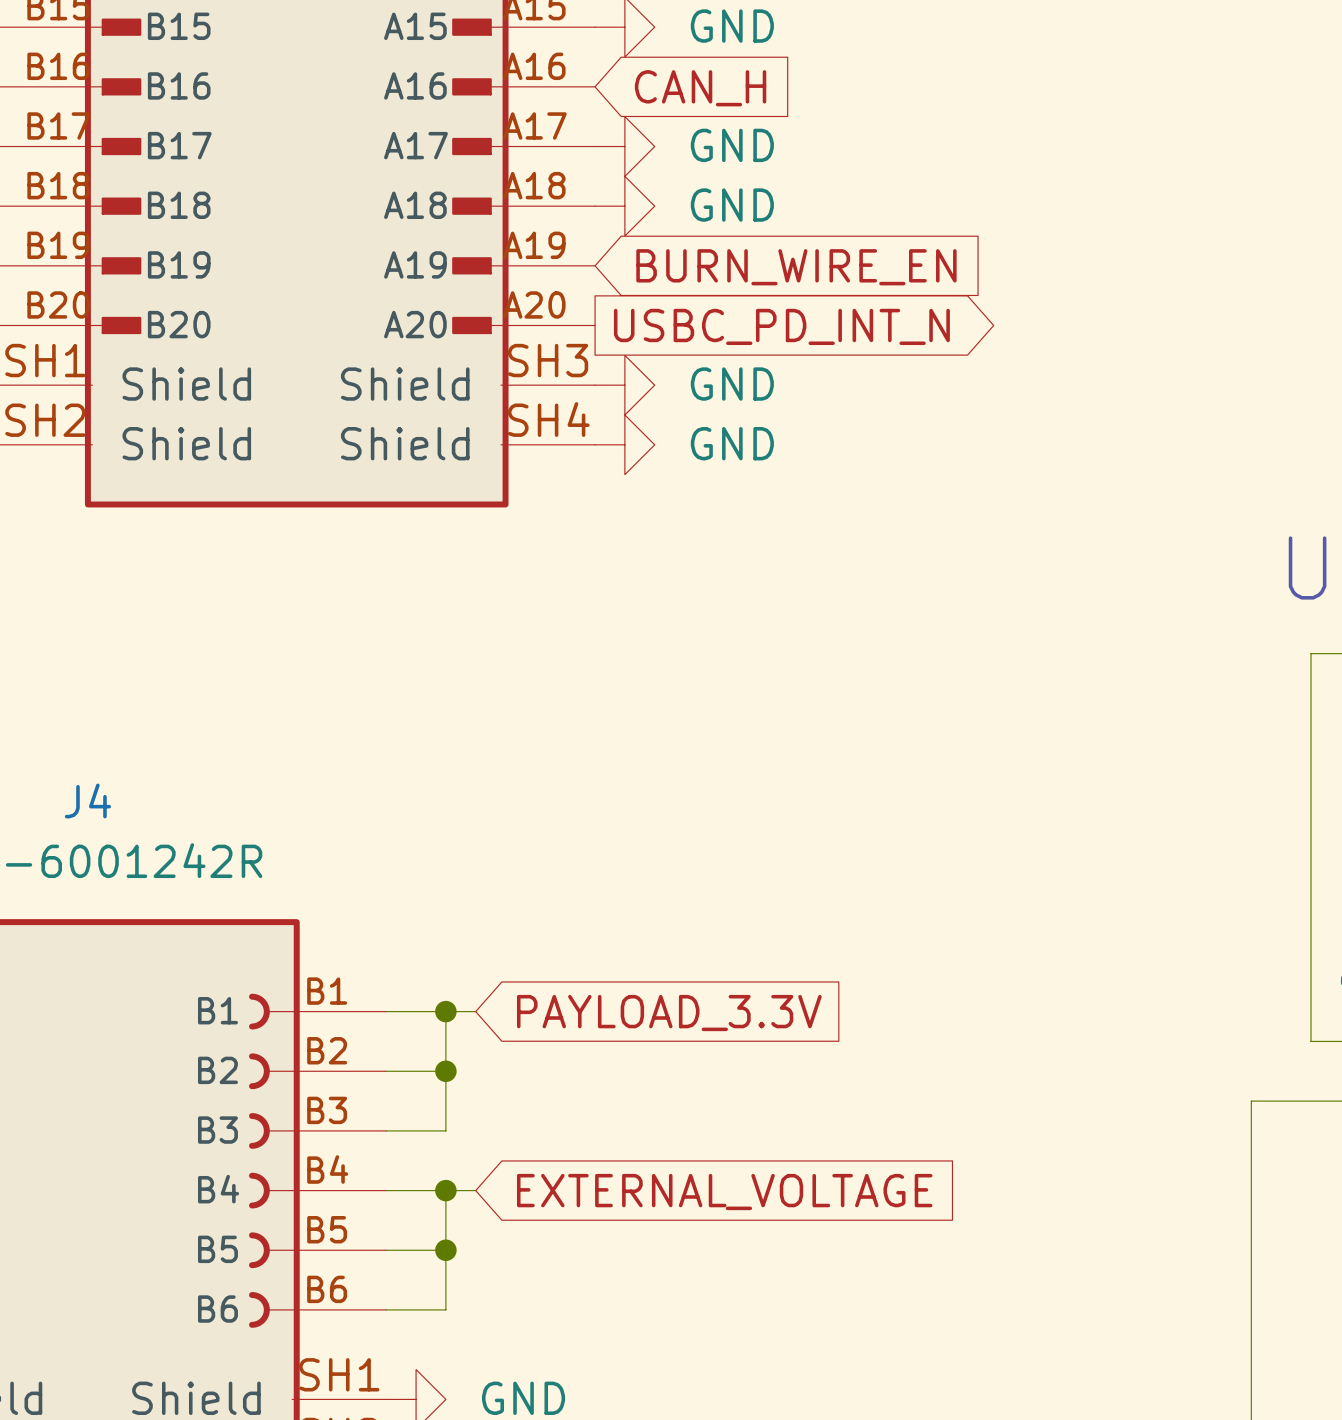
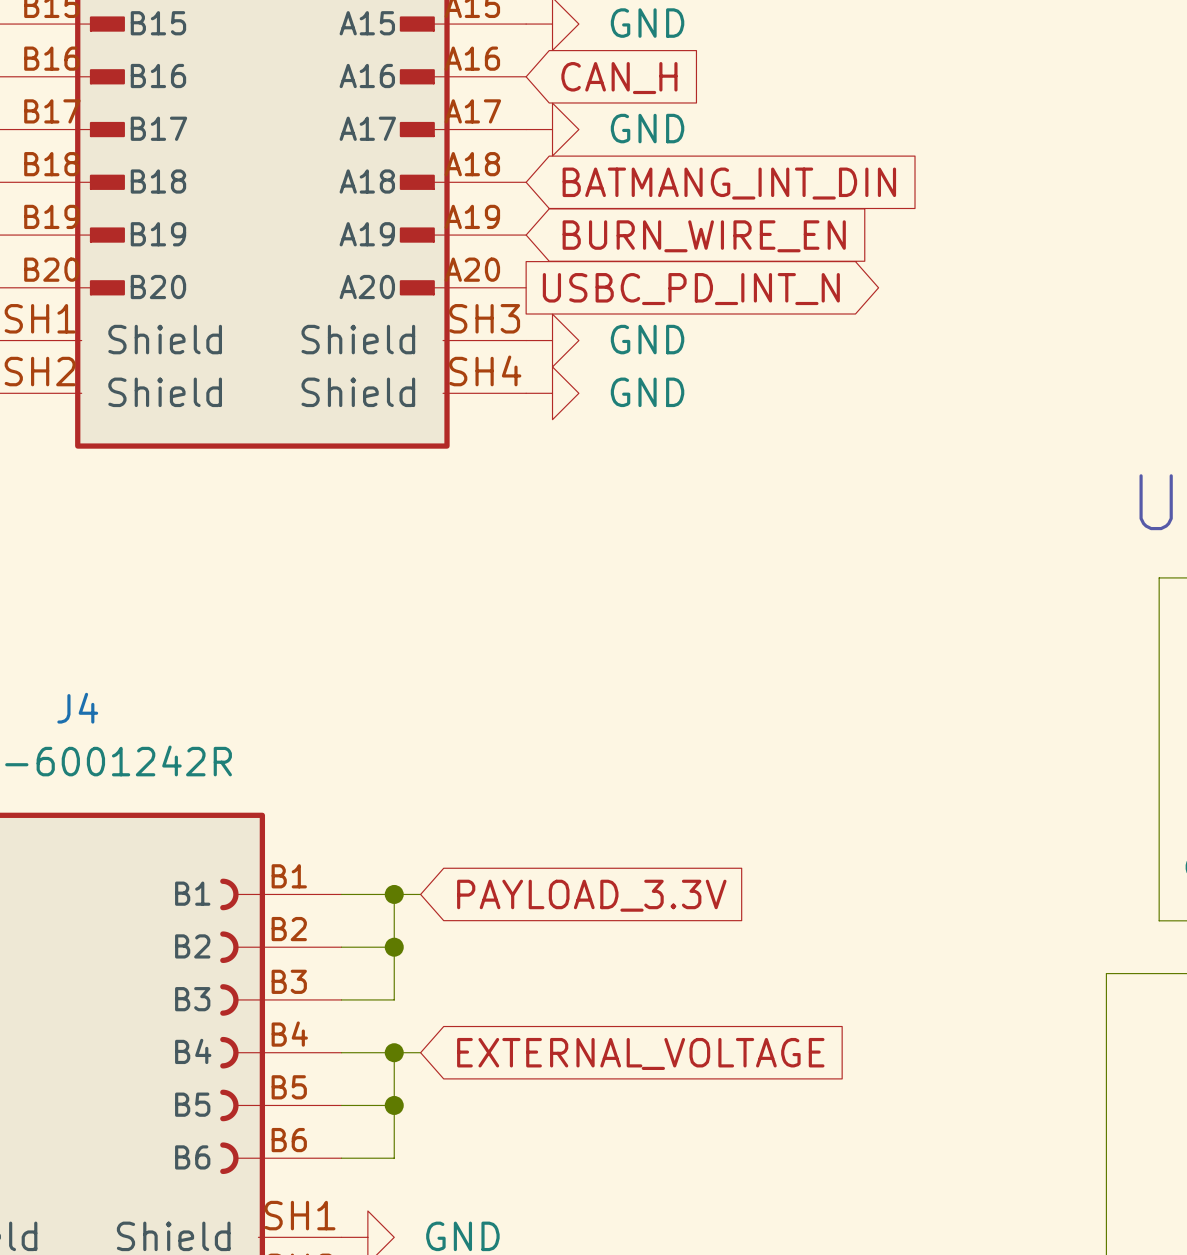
power symbol: GND (624, 206) -> none
global label: none -> BATMANG_INT_DIN (729, 183)

